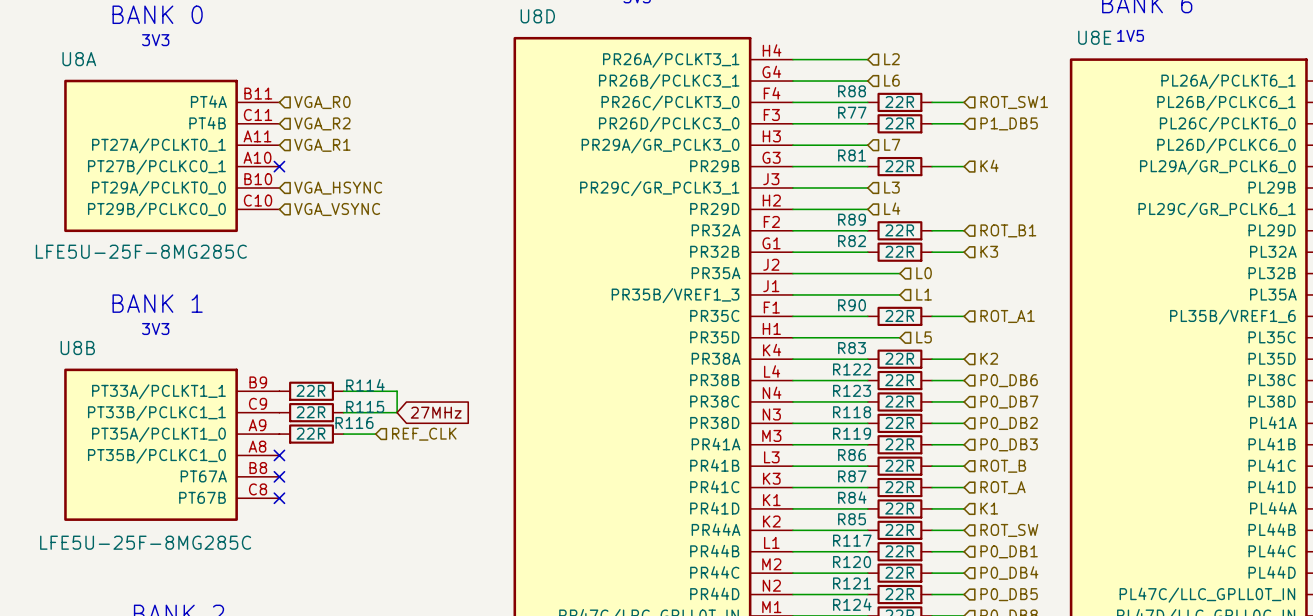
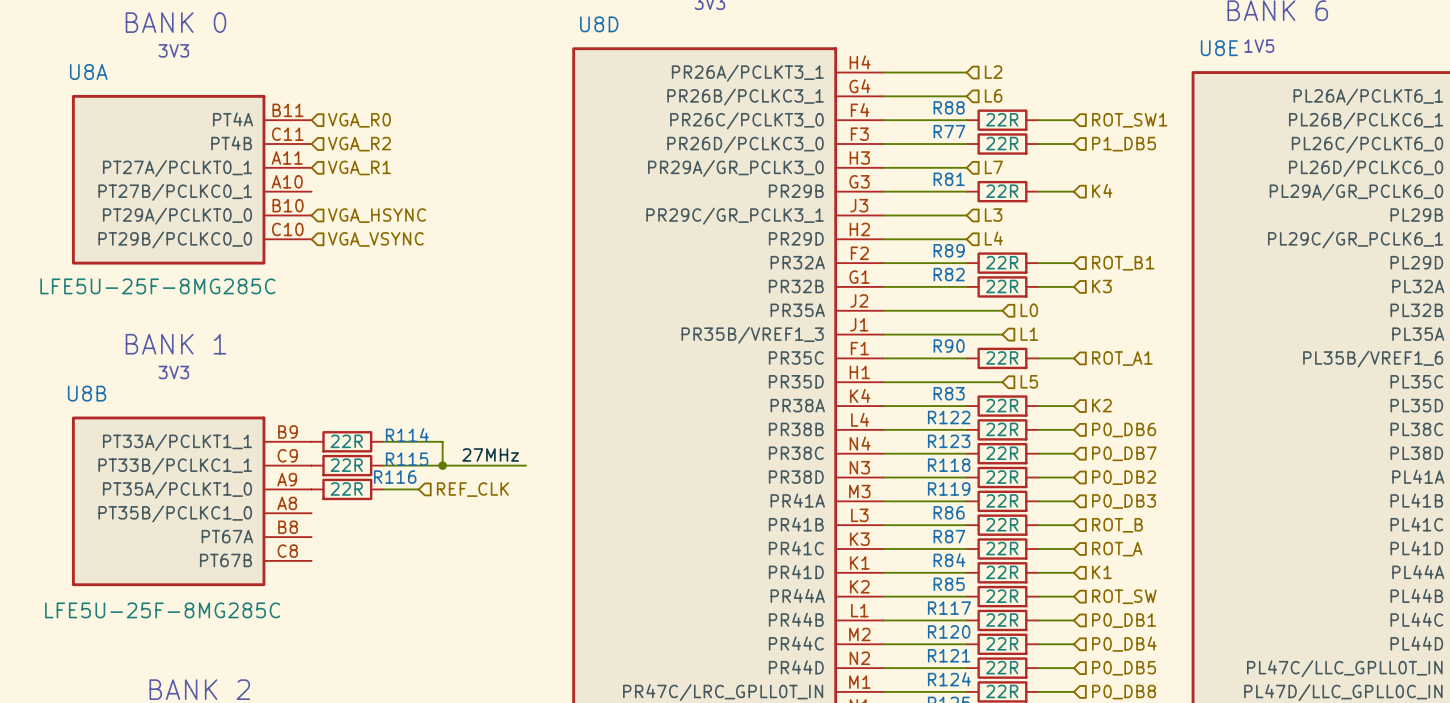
no-connect mark: (279, 166) -> none
label: none -> 27MHz (490, 454)
wire: none -> (442, 465) (526, 465)
junction: none -> (442, 465)
global label: 27MHz (436, 412) -> none
no-connect mark: (279, 455) -> none
no-connect mark: (279, 476) -> none
no-connect mark: (279, 498) -> none

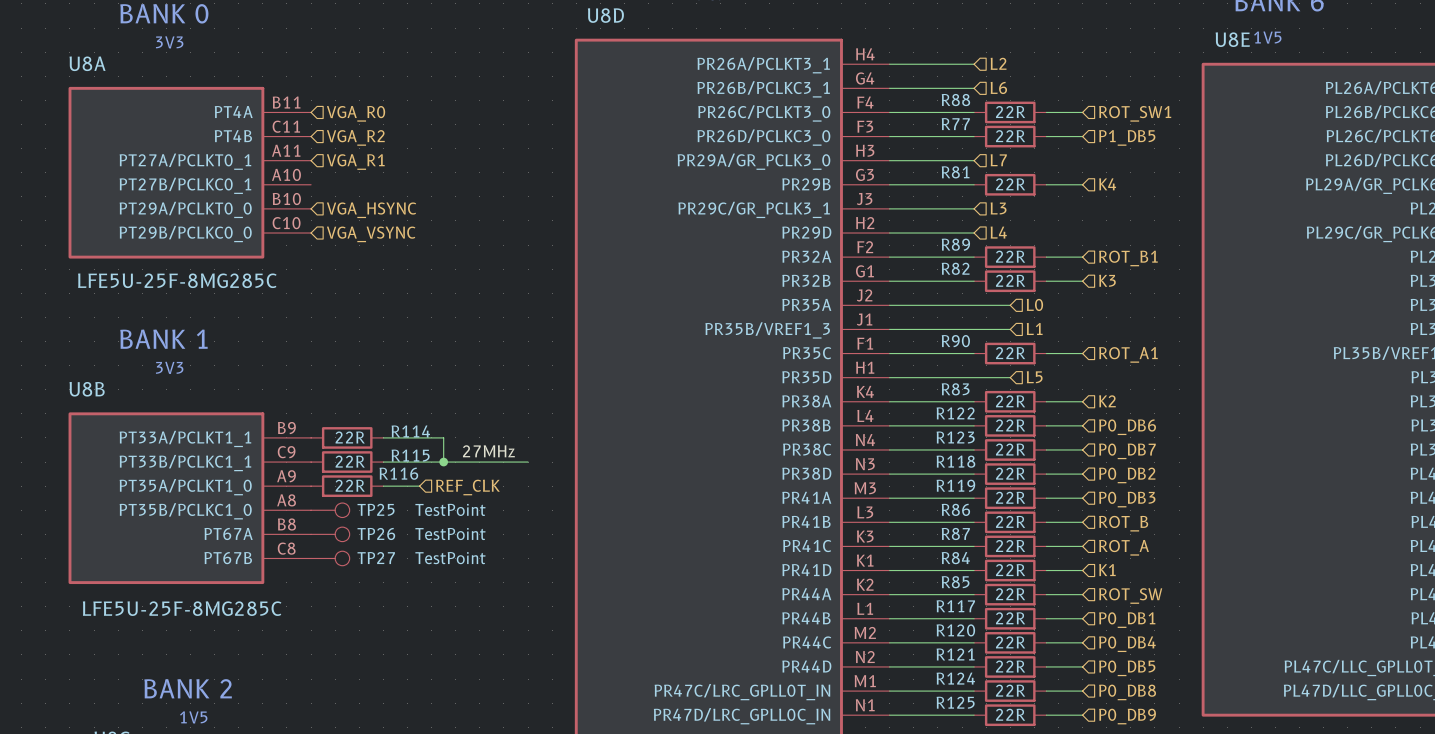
TP25: none -> TestPoint (330, 510)
TP26: none -> TestPoint (330, 534)
TP27: none -> TestPoint (330, 558)

